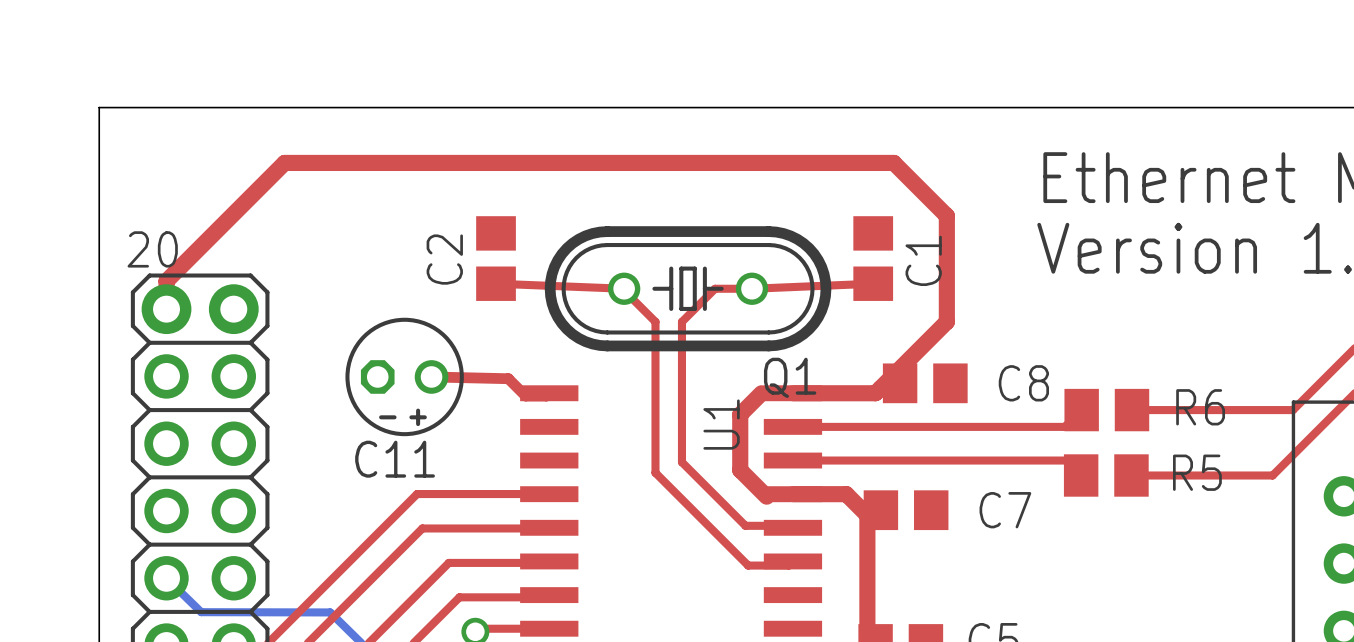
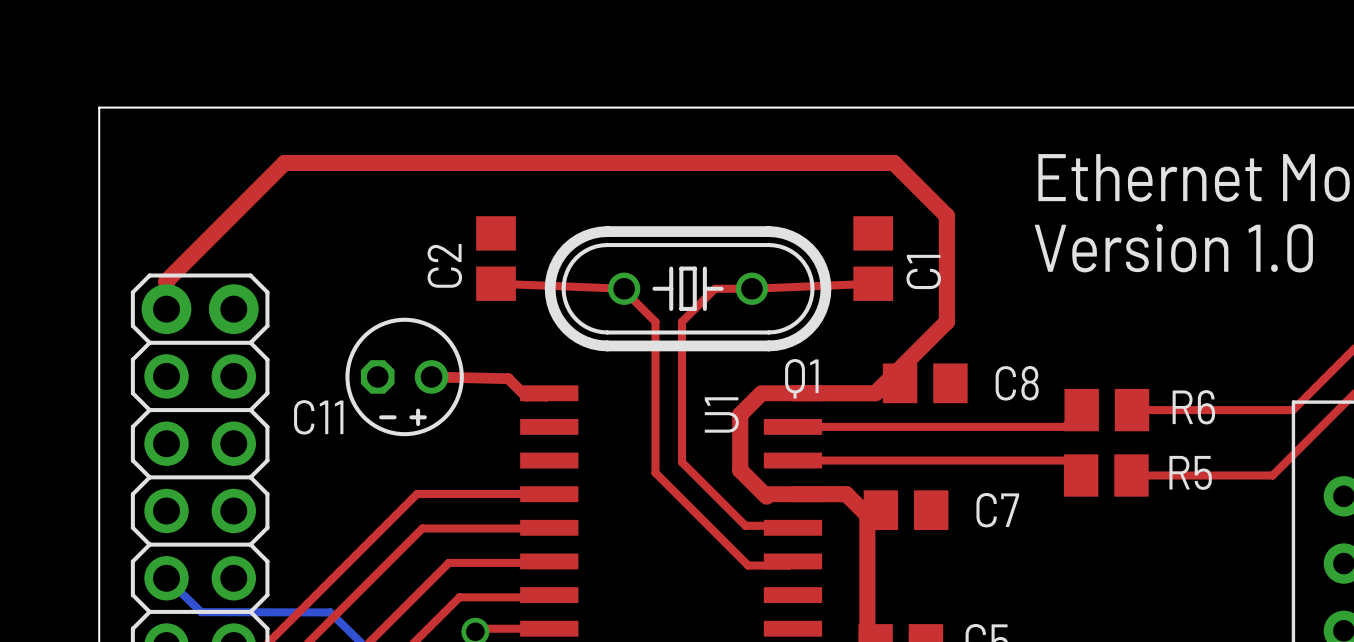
text: 20 (152, 249) -> none
C11 name position: C11 (395, 459) -> C11 (318, 417)

